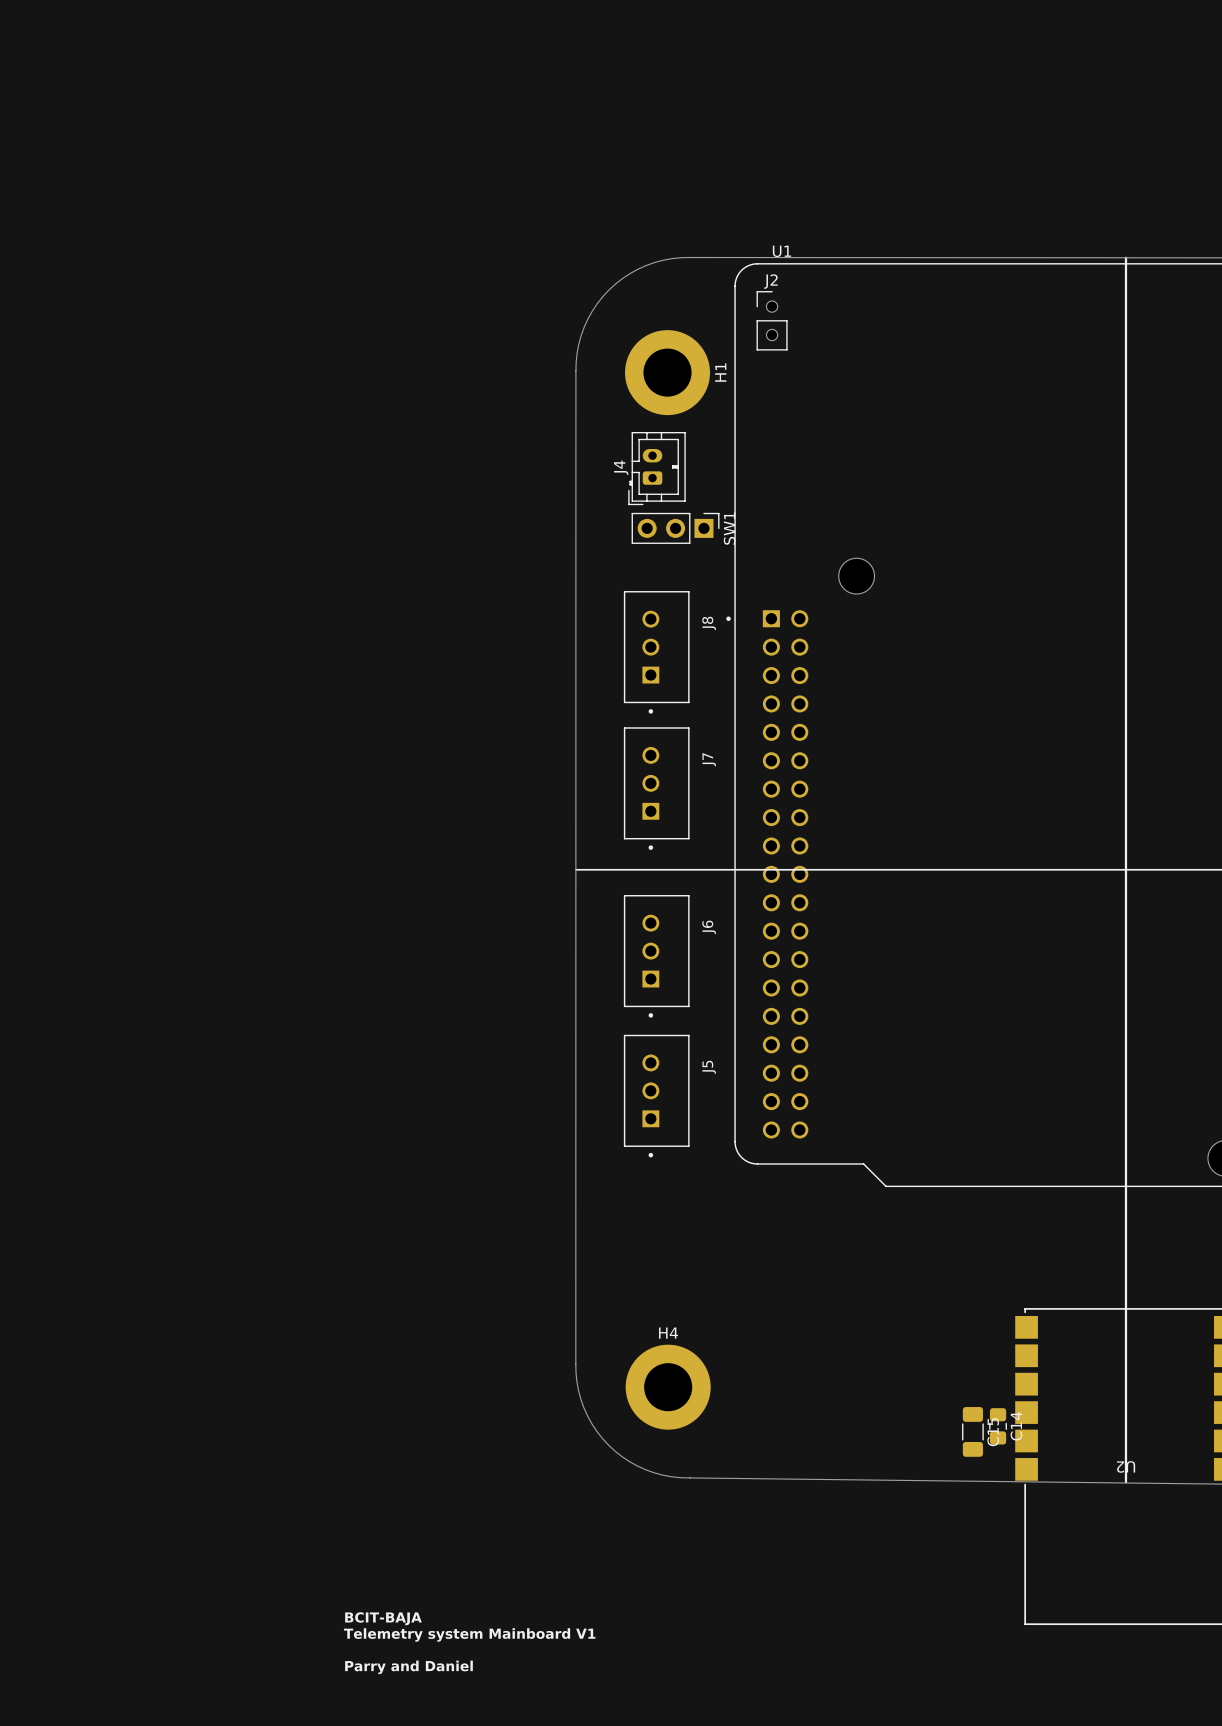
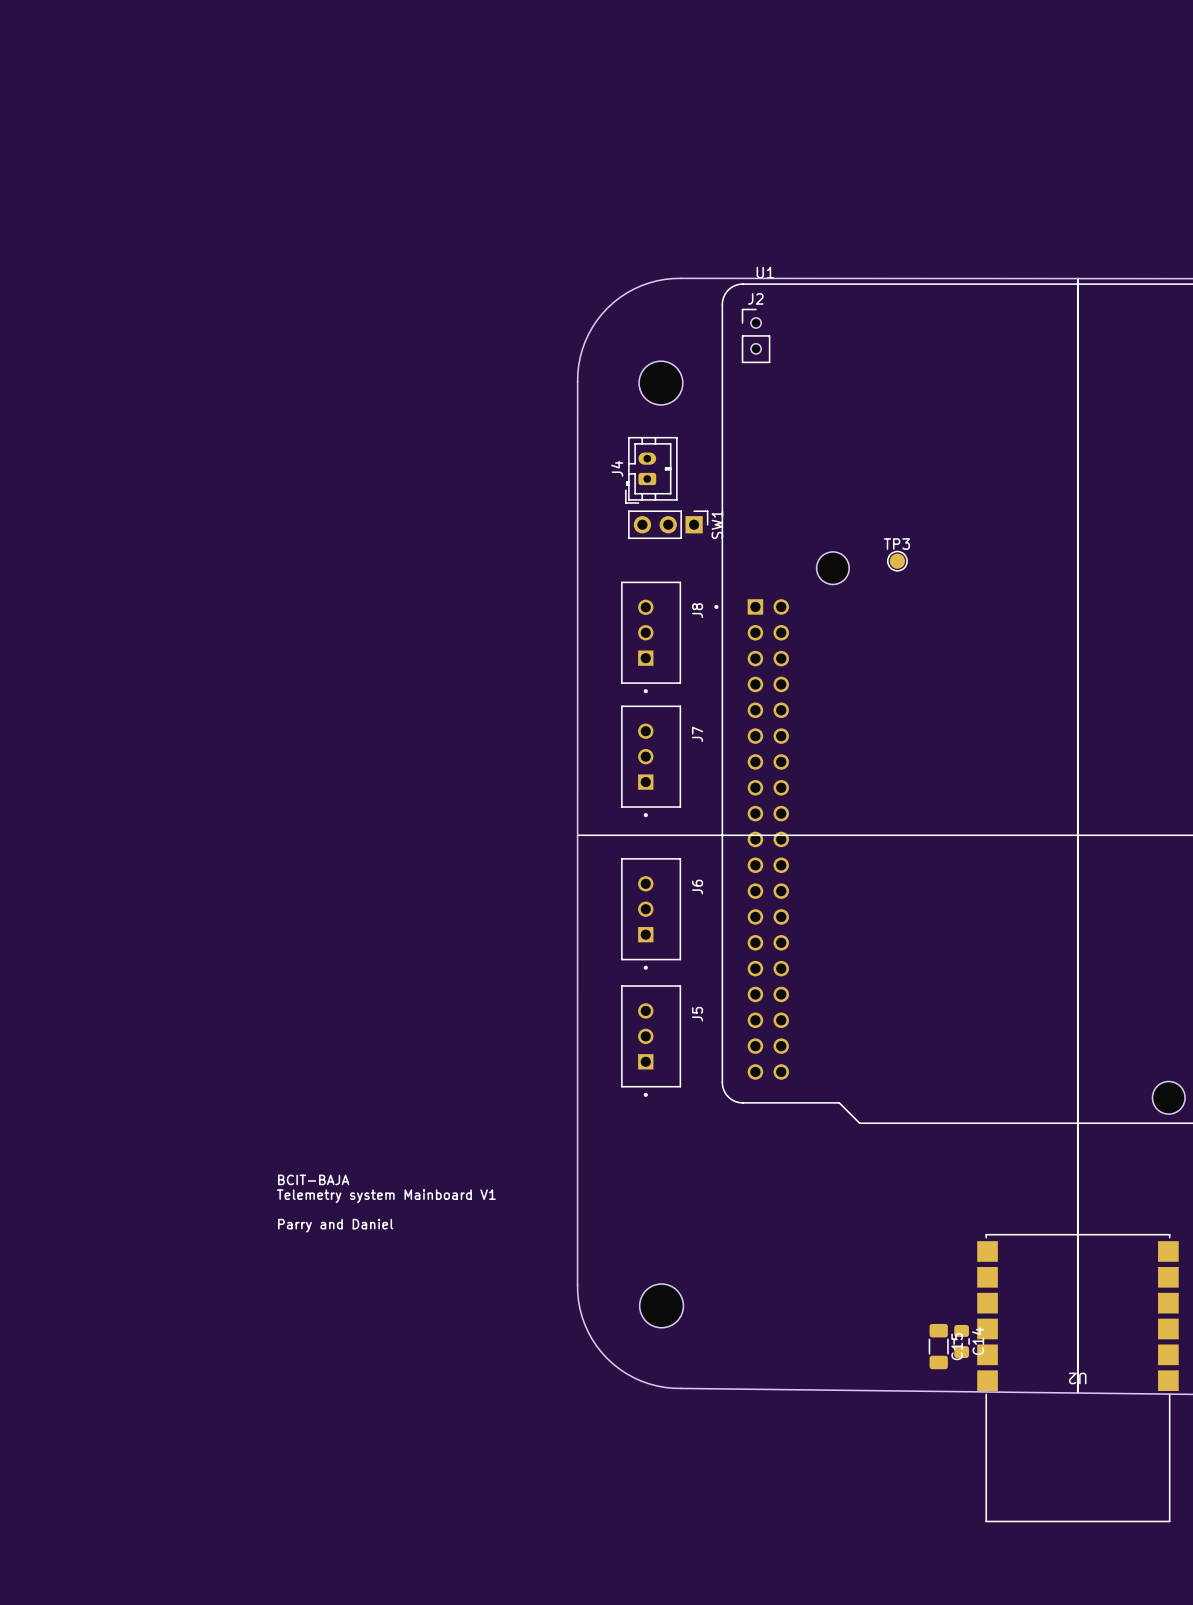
H1: (667, 372) -> none
part: none -> (660, 383)
TP3: none -> (897, 561)
text: none -> BCIT-BAJA (313, 1179)
text: none -> Telemetry system Mainboard V1 (386, 1196)
text: none -> Parry and Daniel (335, 1225)
H4: (668, 1387) -> none
part: none -> (661, 1305)
text: BCIT-BAJA (383, 1618) -> none
text: Telemetry system Mainboard V1 (469, 1634) -> none
text: Parry and Daniel (409, 1667) -> none

